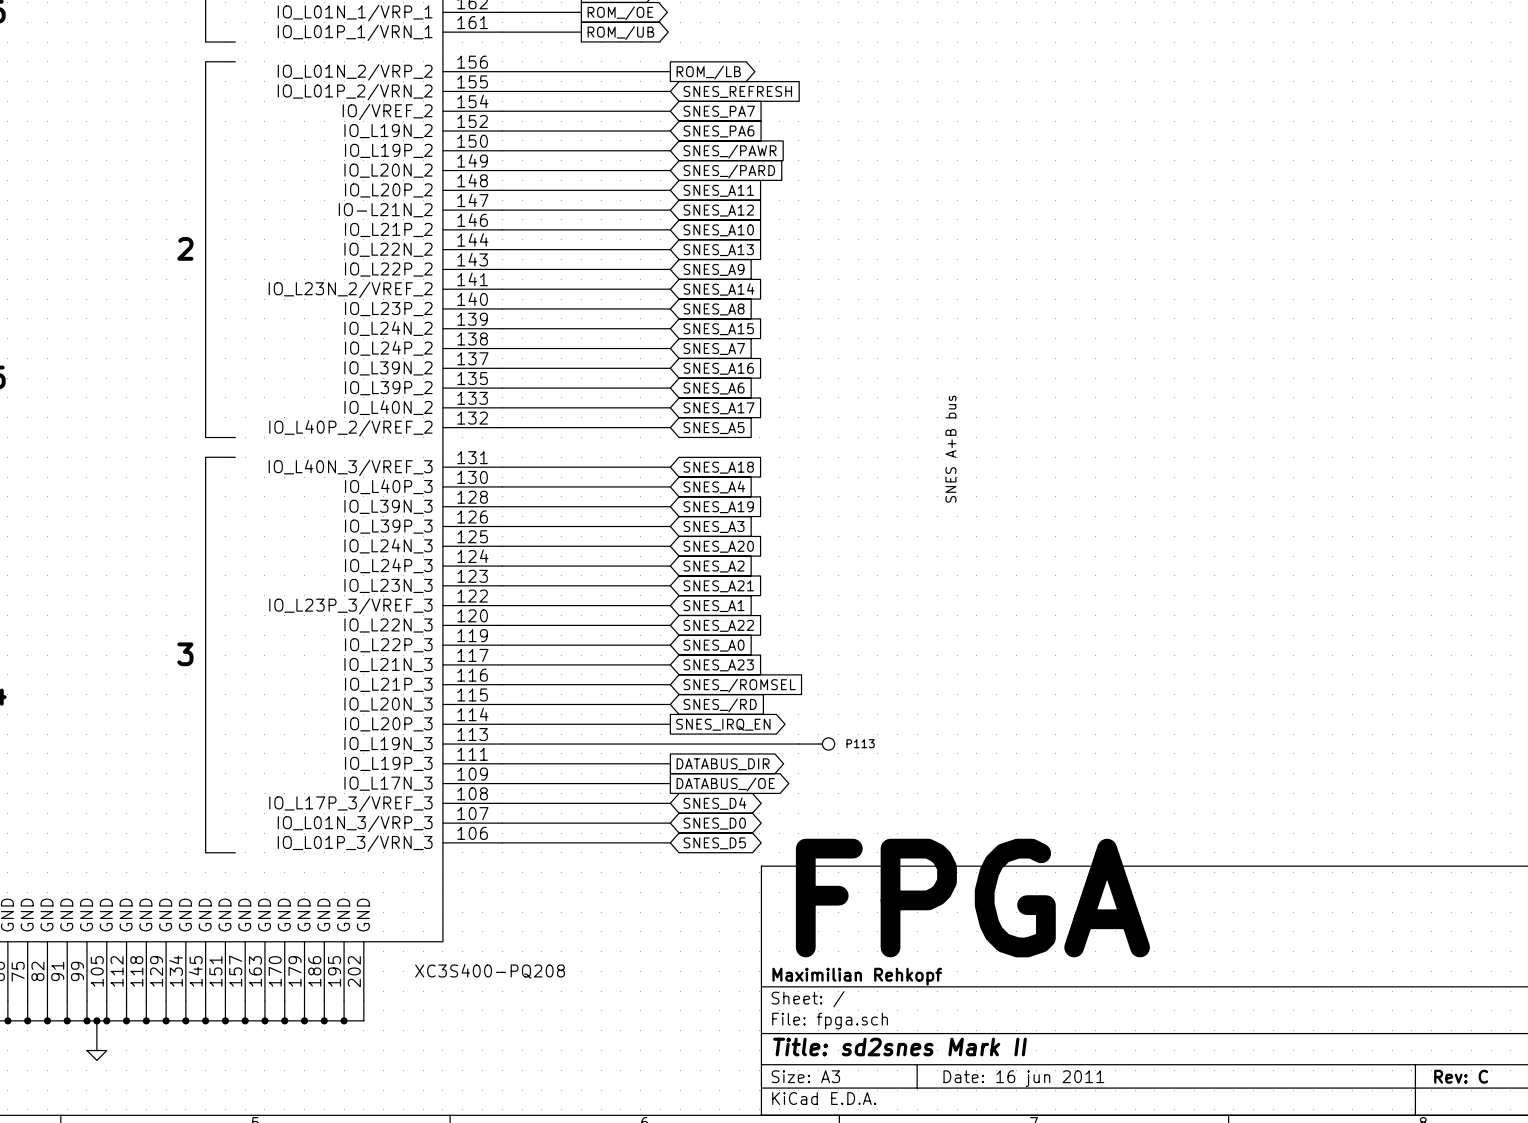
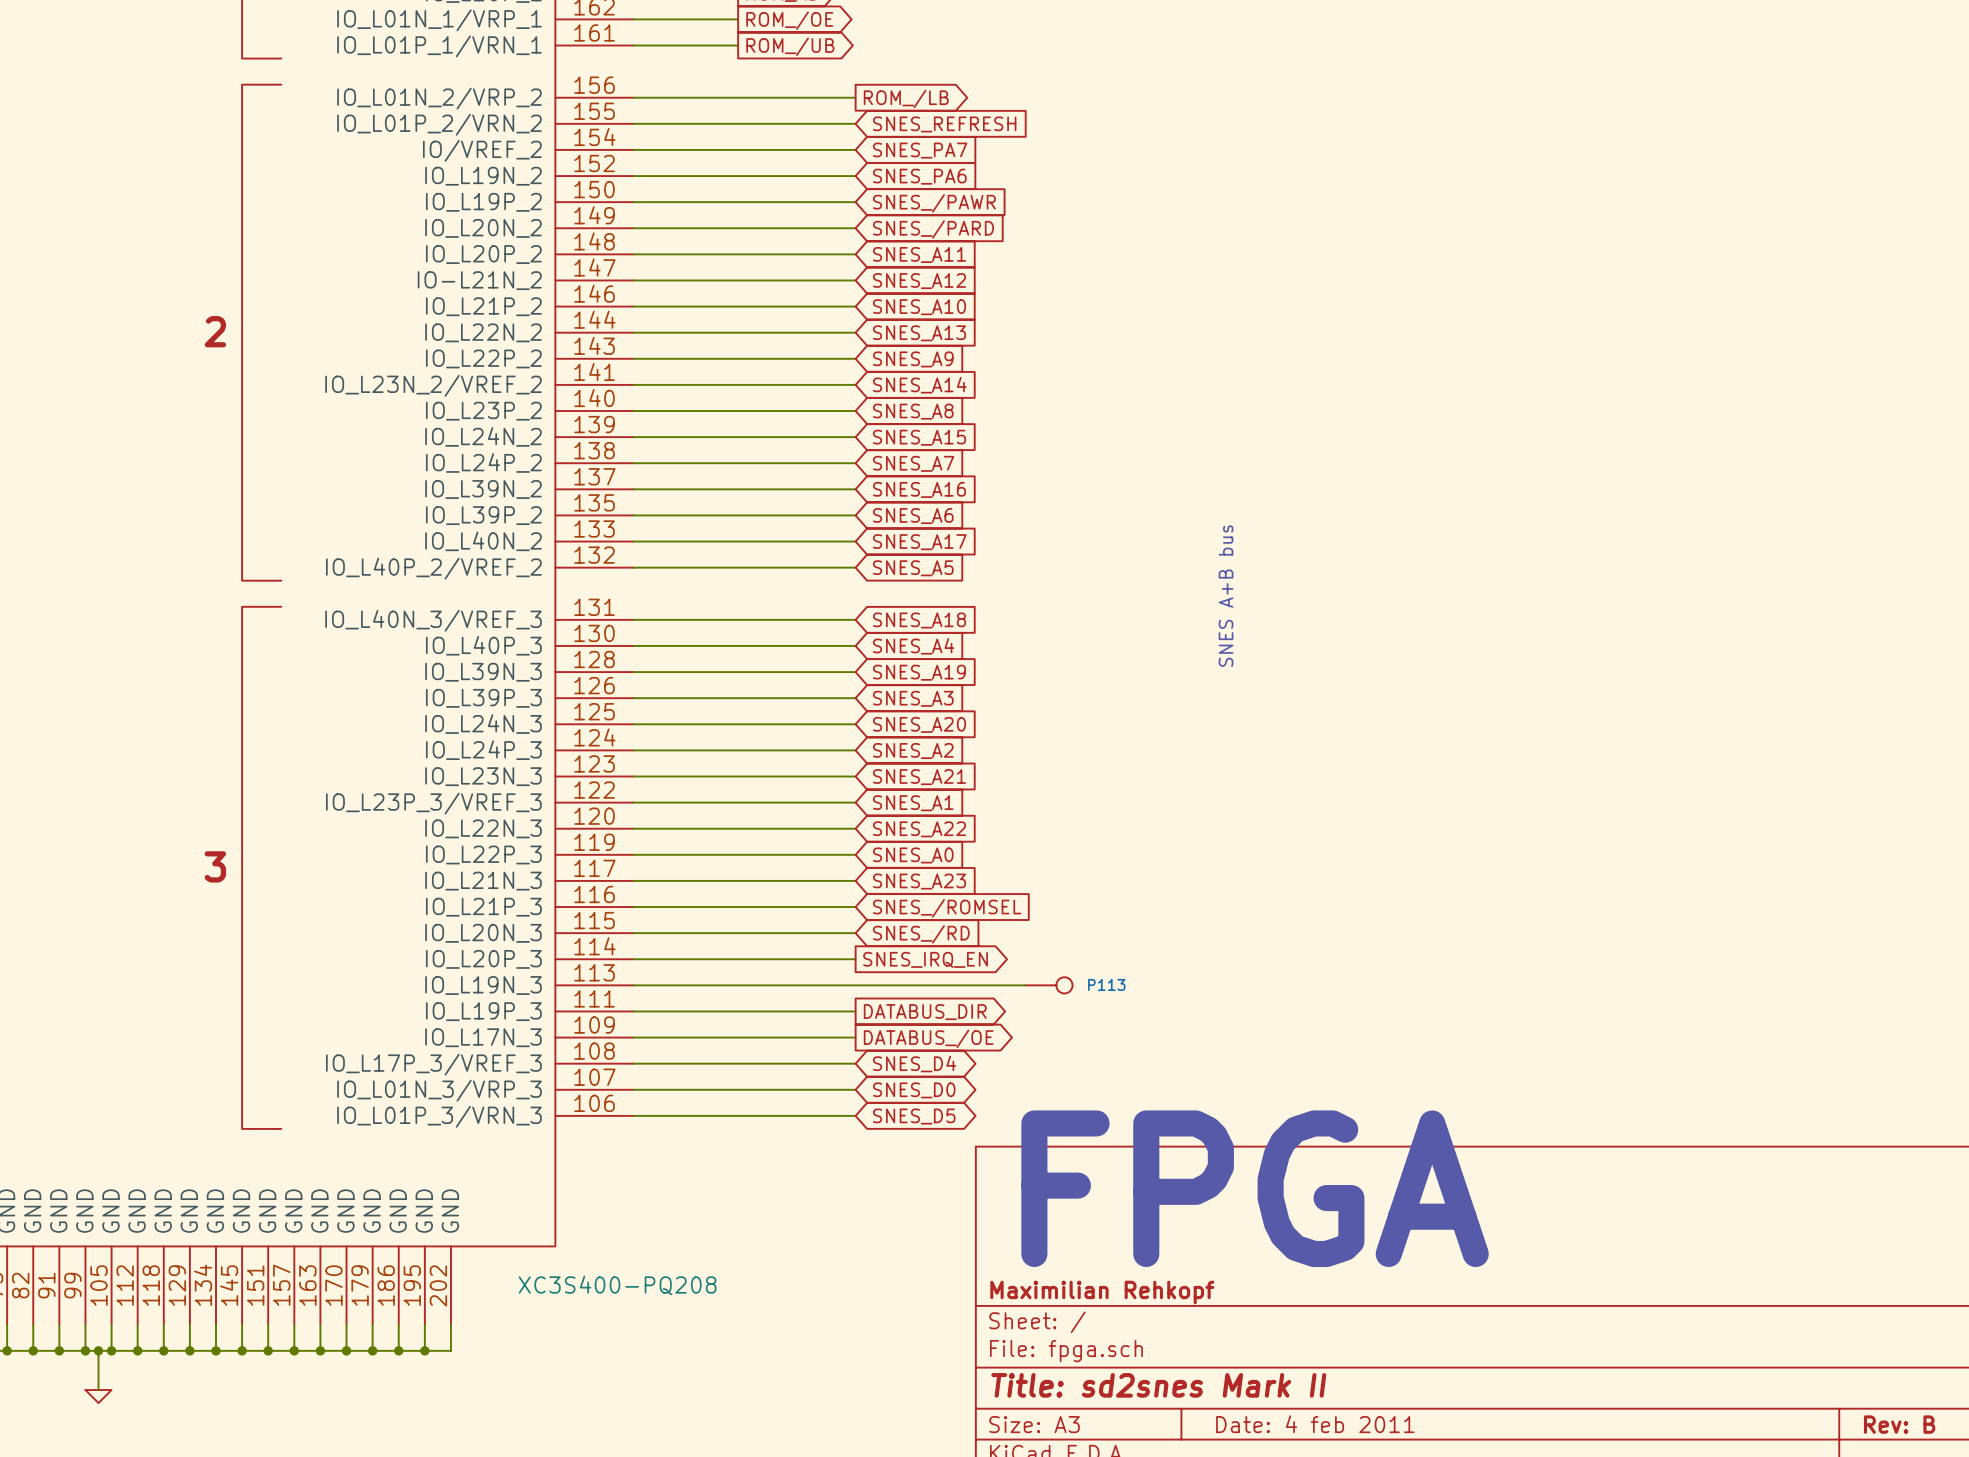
title block: Rev: C (1461, 1076) -> Rev: B (1899, 1424)
title block: Date: 16 jun 2011 (1023, 1078) -> Date: 4 feb 2011 (1315, 1424)

